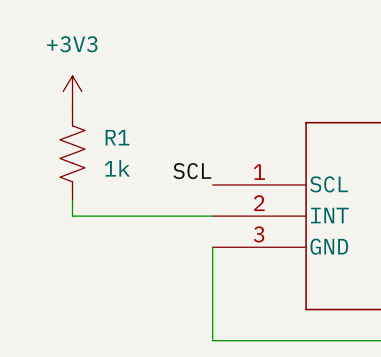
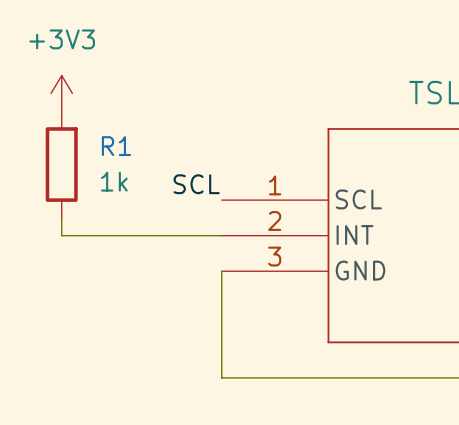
R1 symbol: [60, 107, 85, 201] -> [45, 111, 78, 218]

